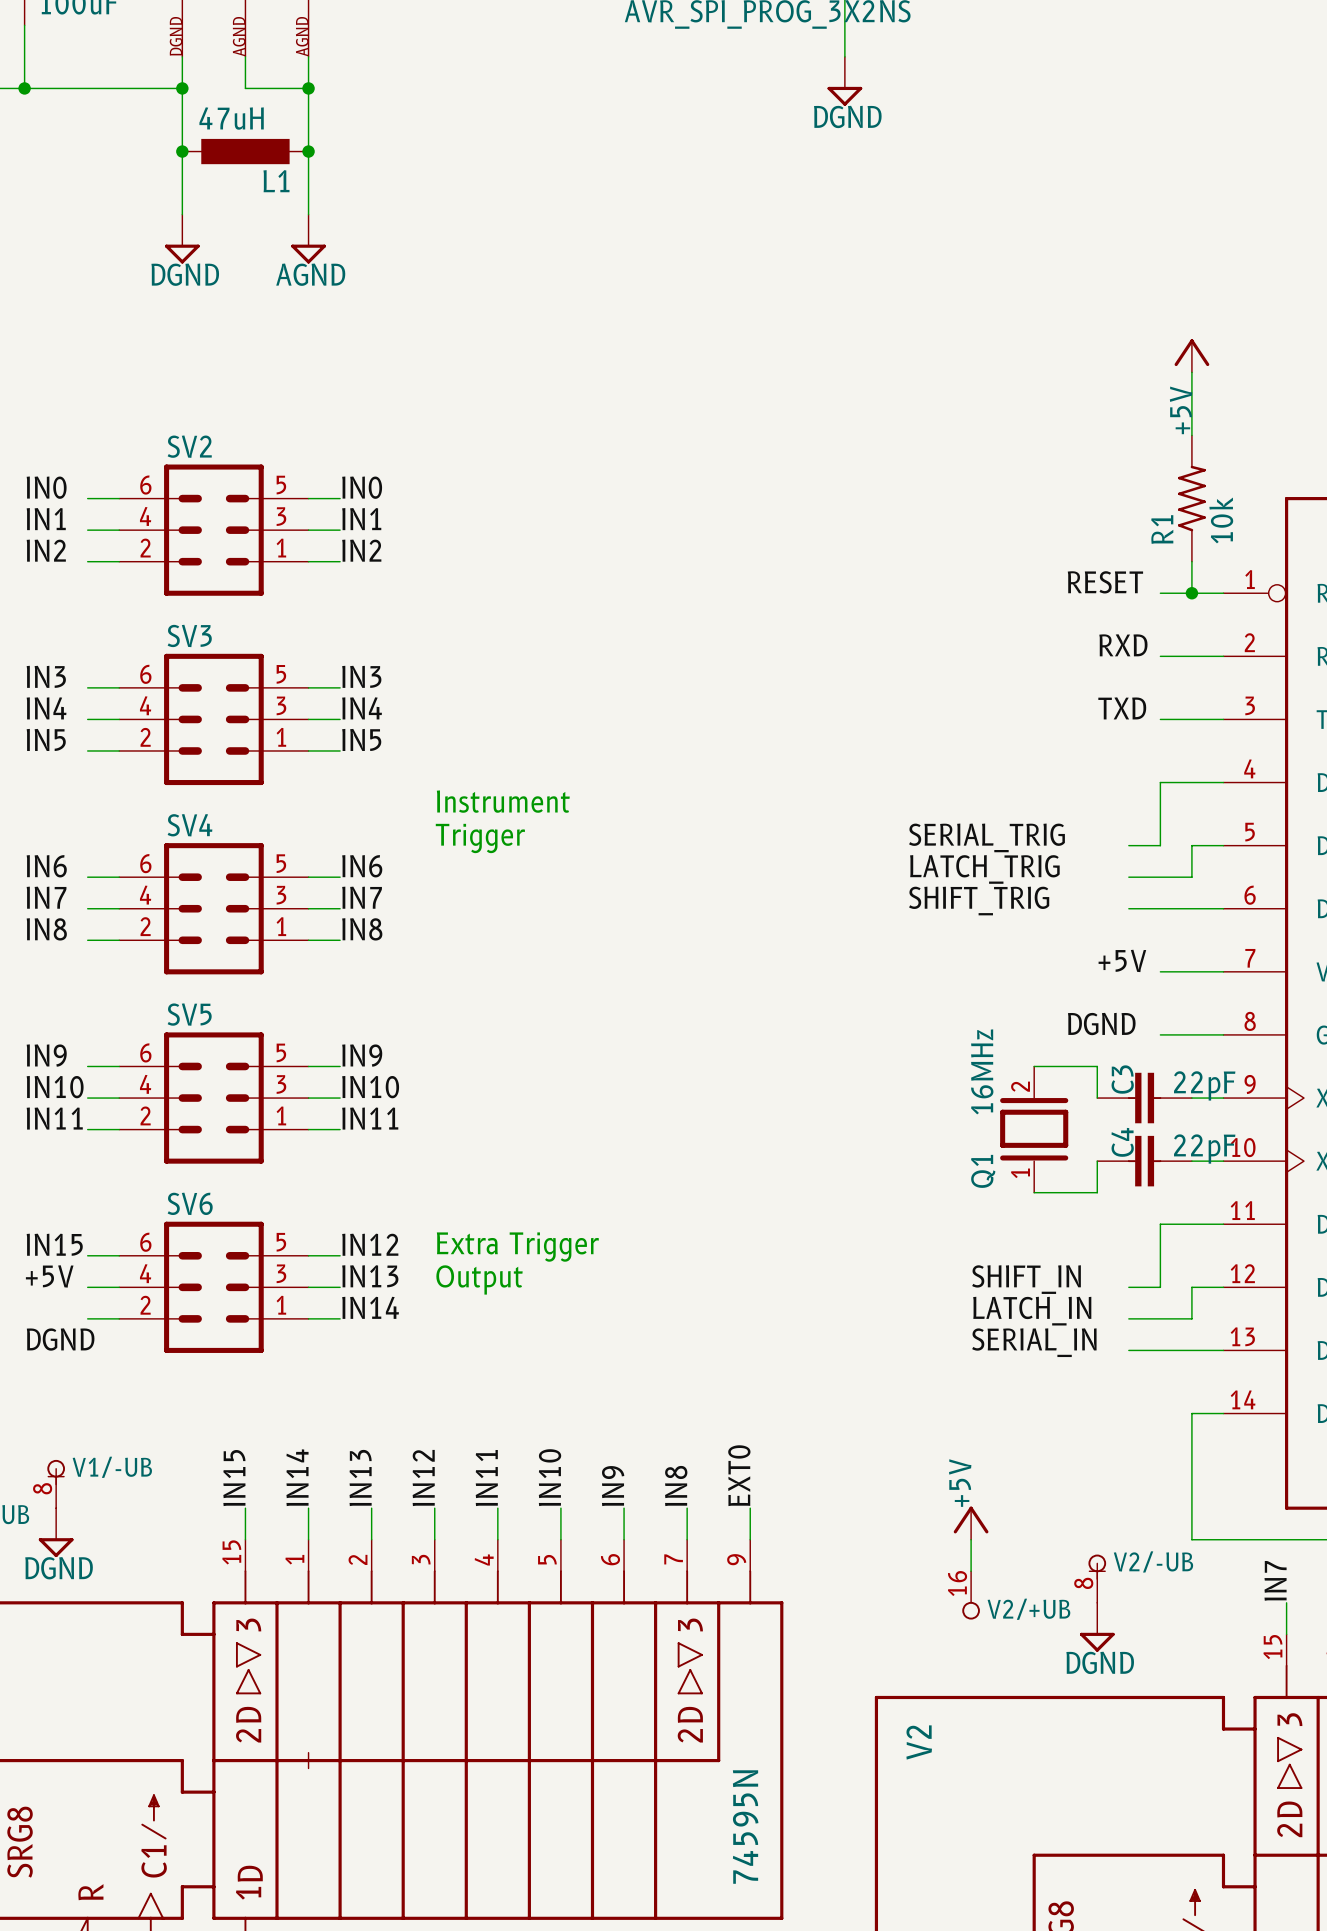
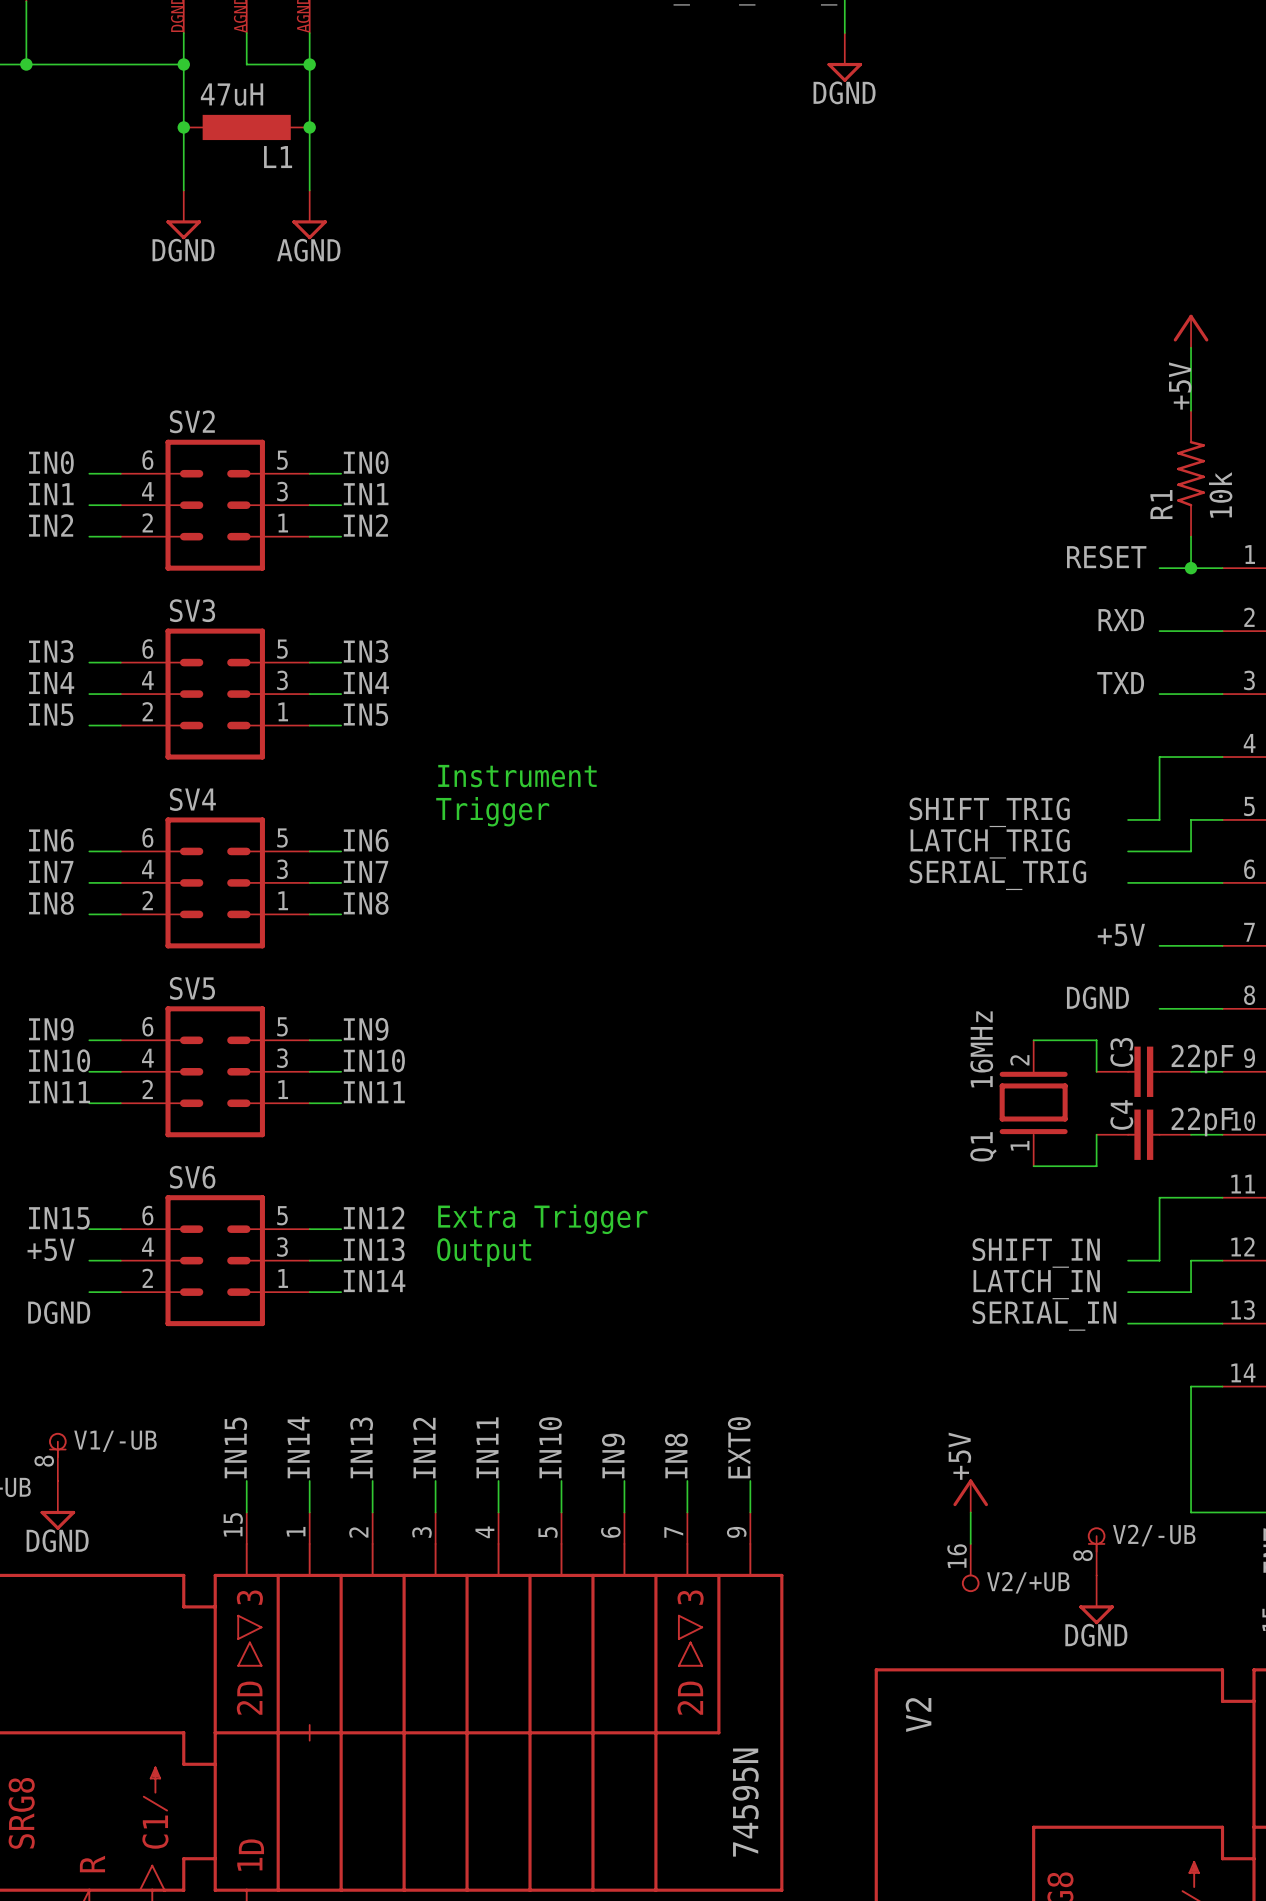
label: SERIAL_TRIG (986, 837) -> SHIFT_TRIG (989, 812)
label: SHIFT_TRIG (979, 901) -> SERIAL_TRIG (997, 875)

